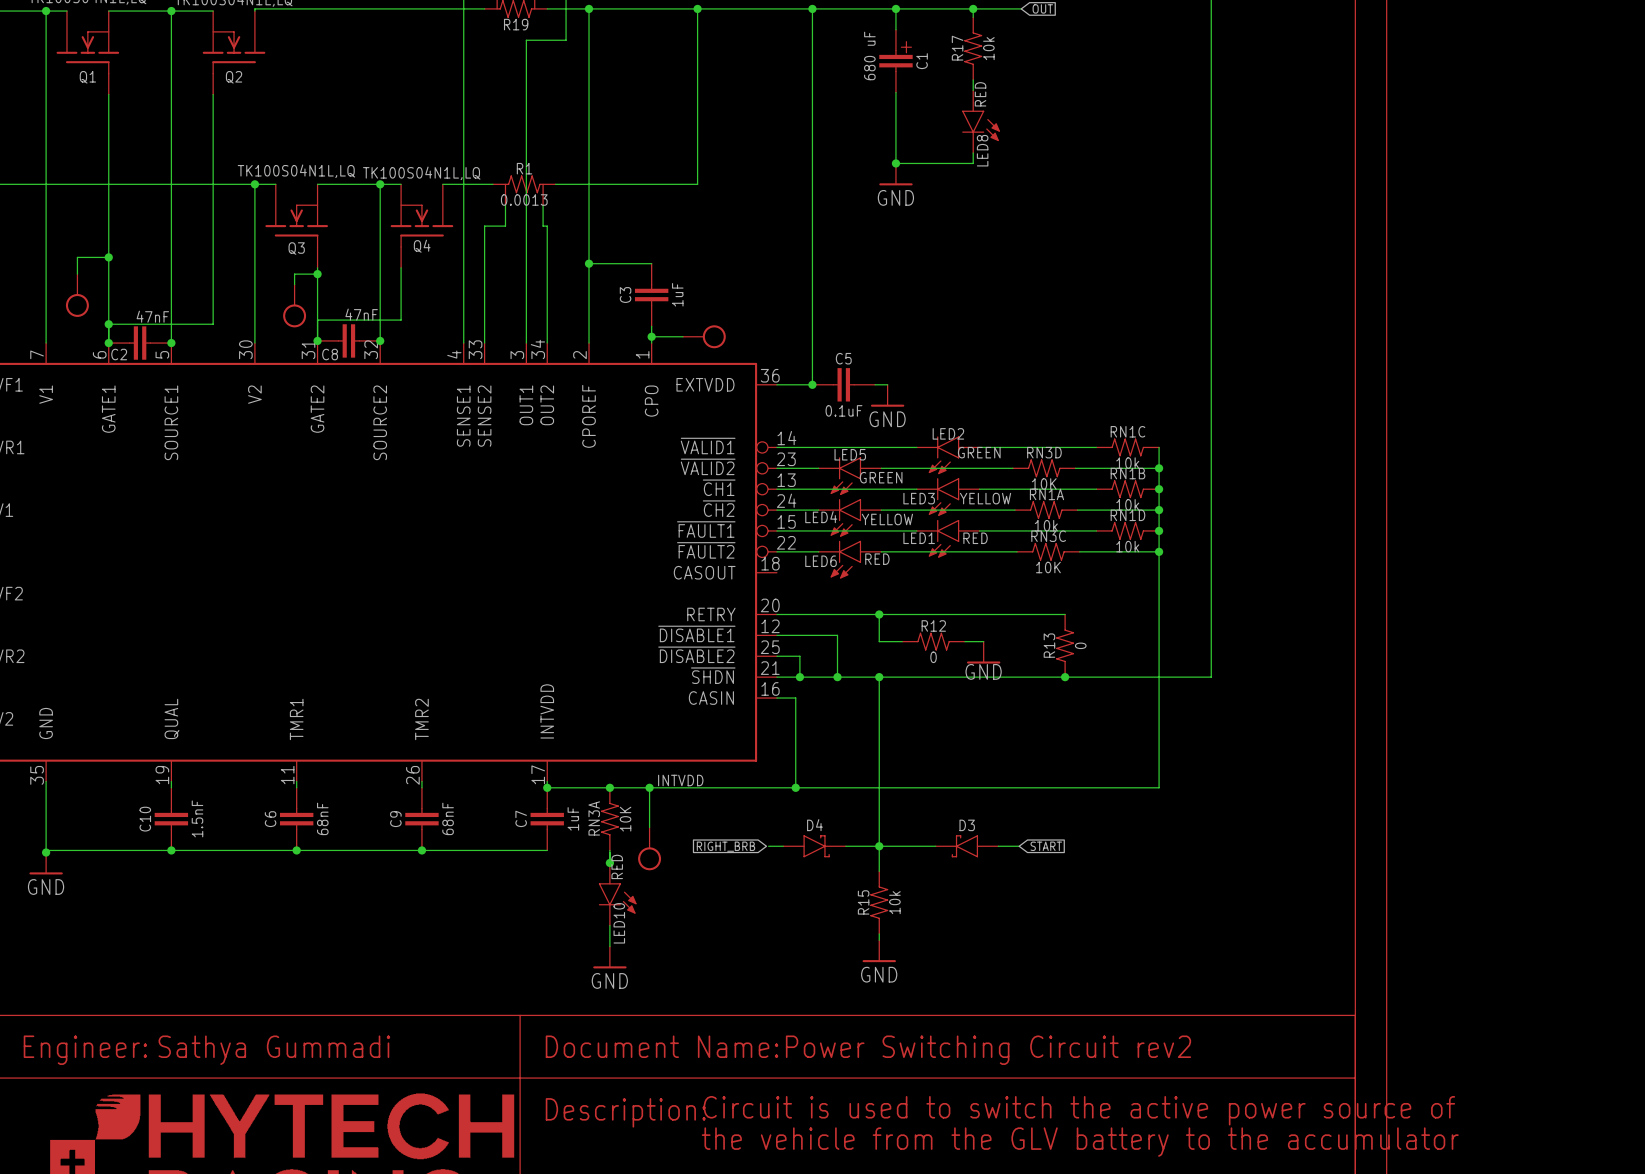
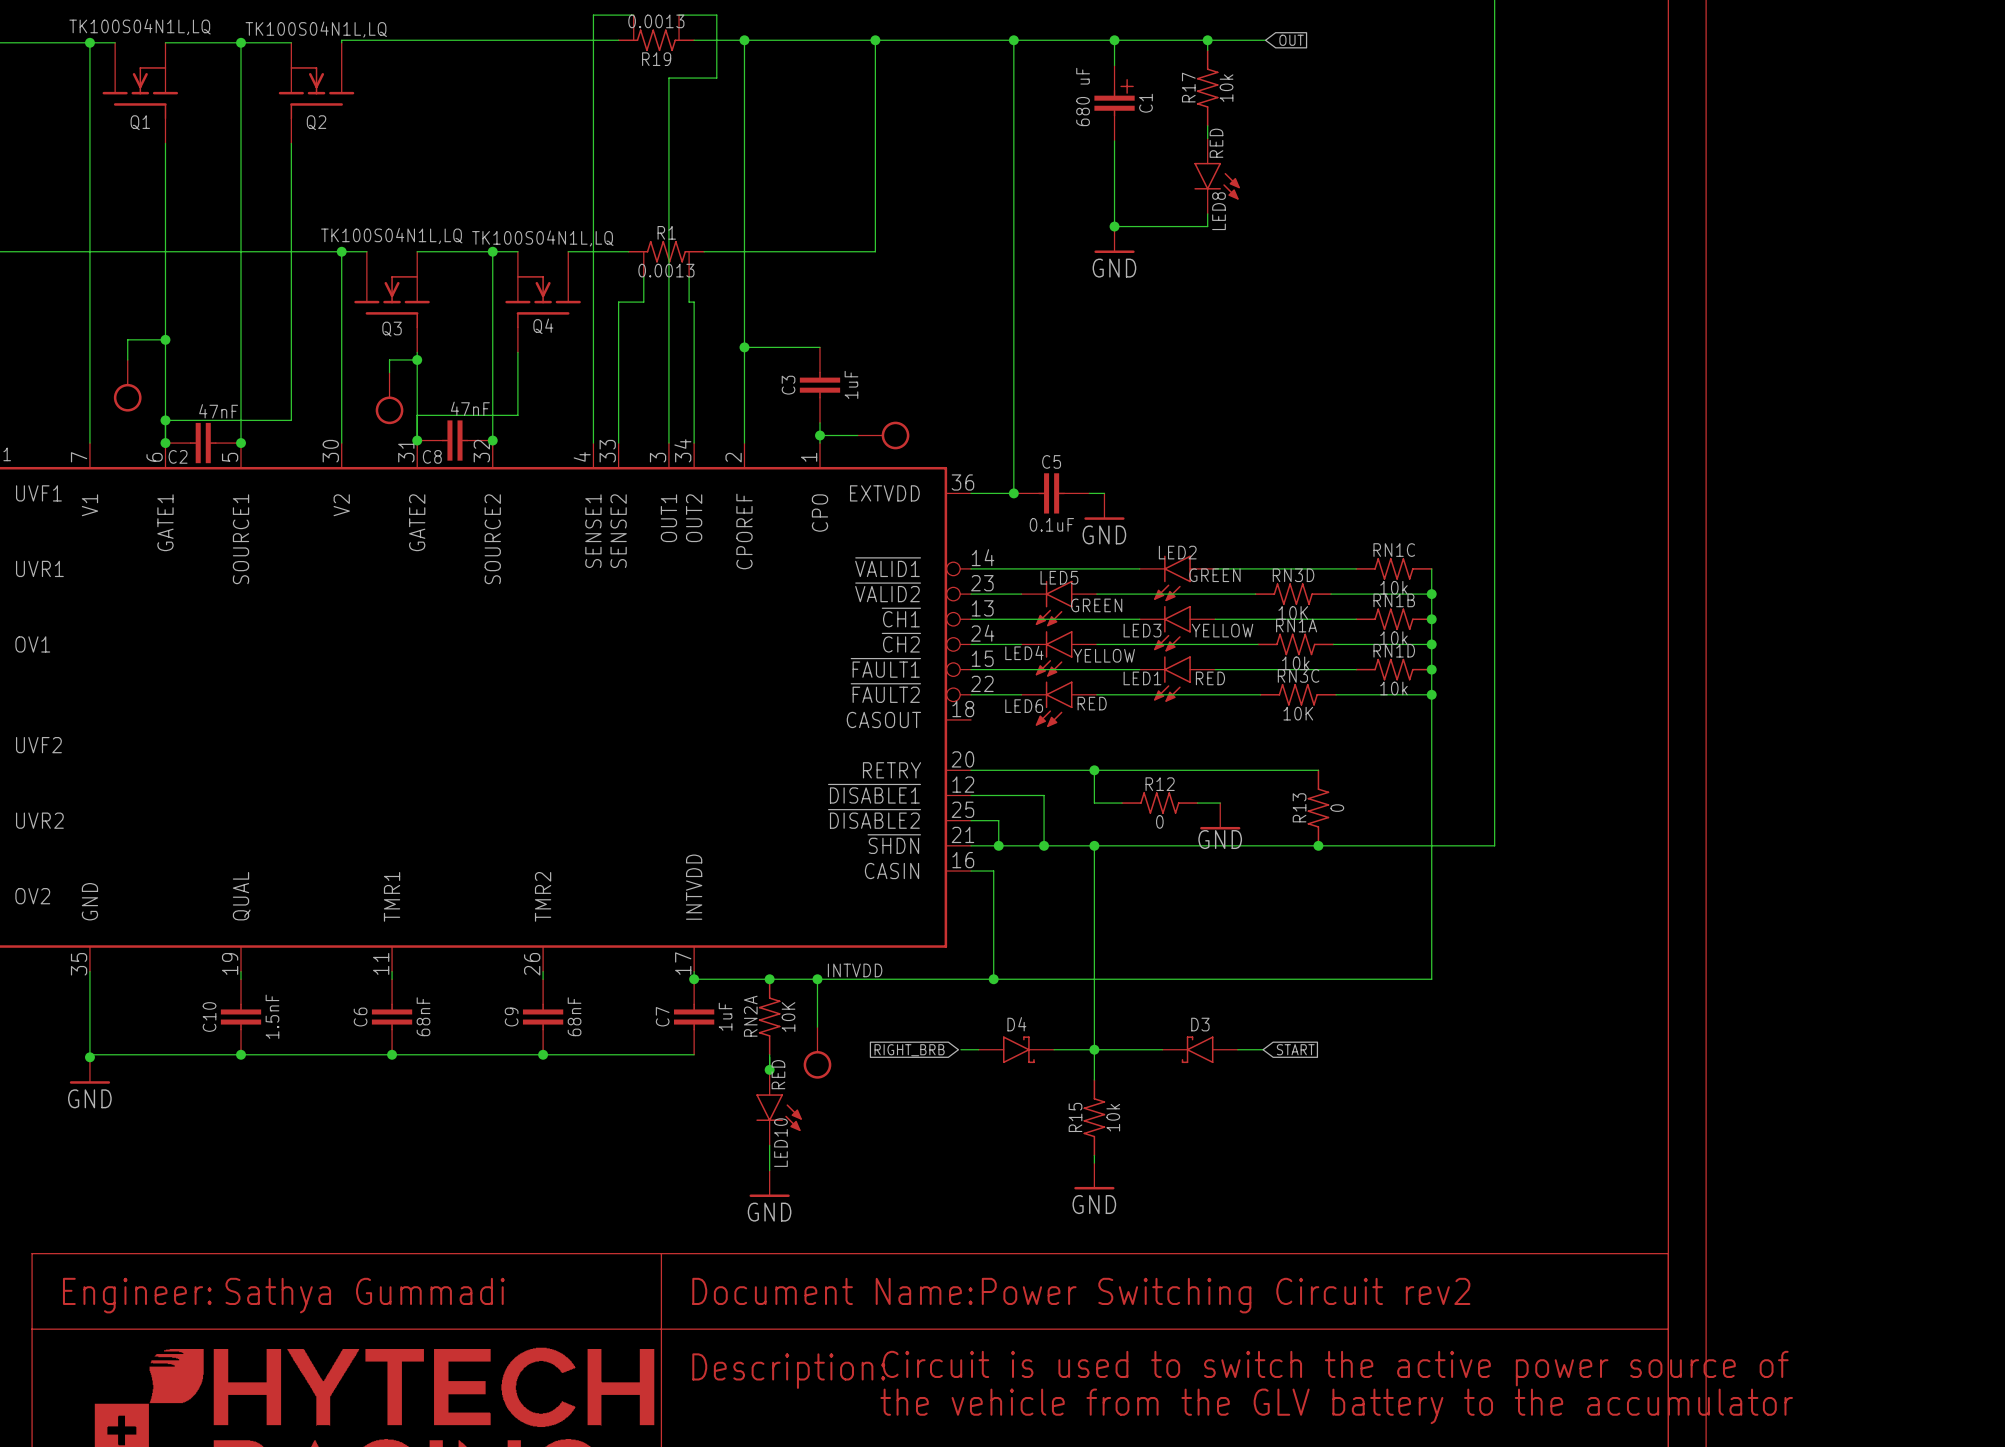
RN3A name: RN3A (594, 818) -> RN2A (750, 1016)

